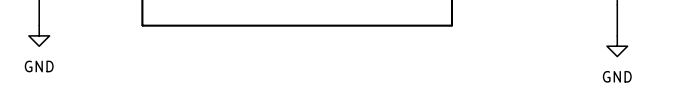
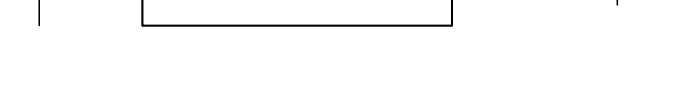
wire: (617, 4) (617, 35) -> none
power symbol: GND (39, 35) -> none
power symbol: GND (617, 46) -> none

